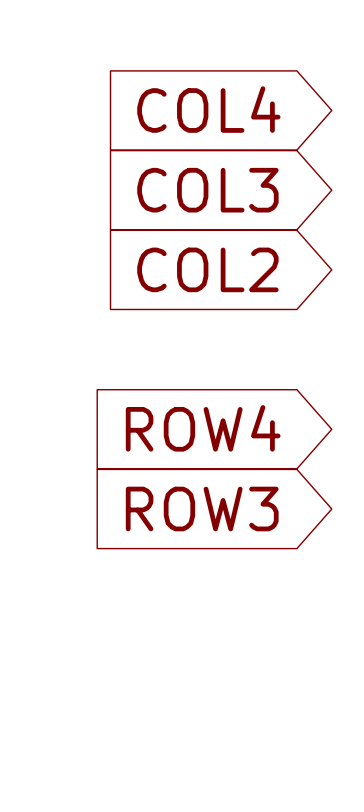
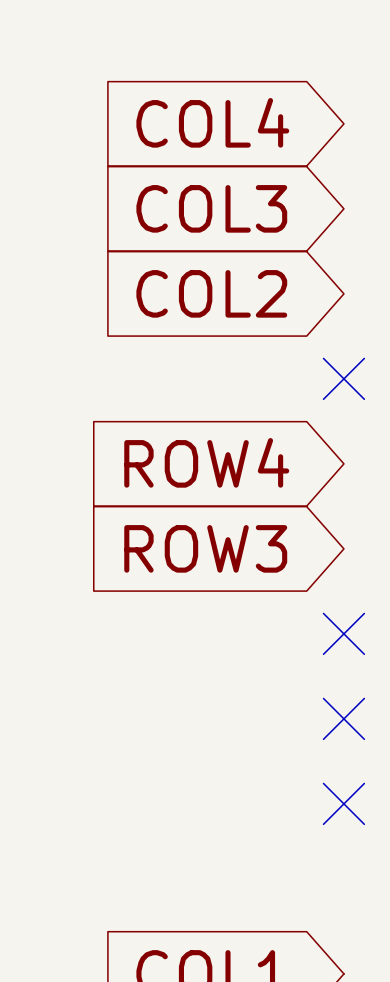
no-connect mark: none -> (343, 378)
no-connect mark: none -> (343, 633)
no-connect mark: none -> (343, 718)
no-connect mark: none -> (343, 803)

